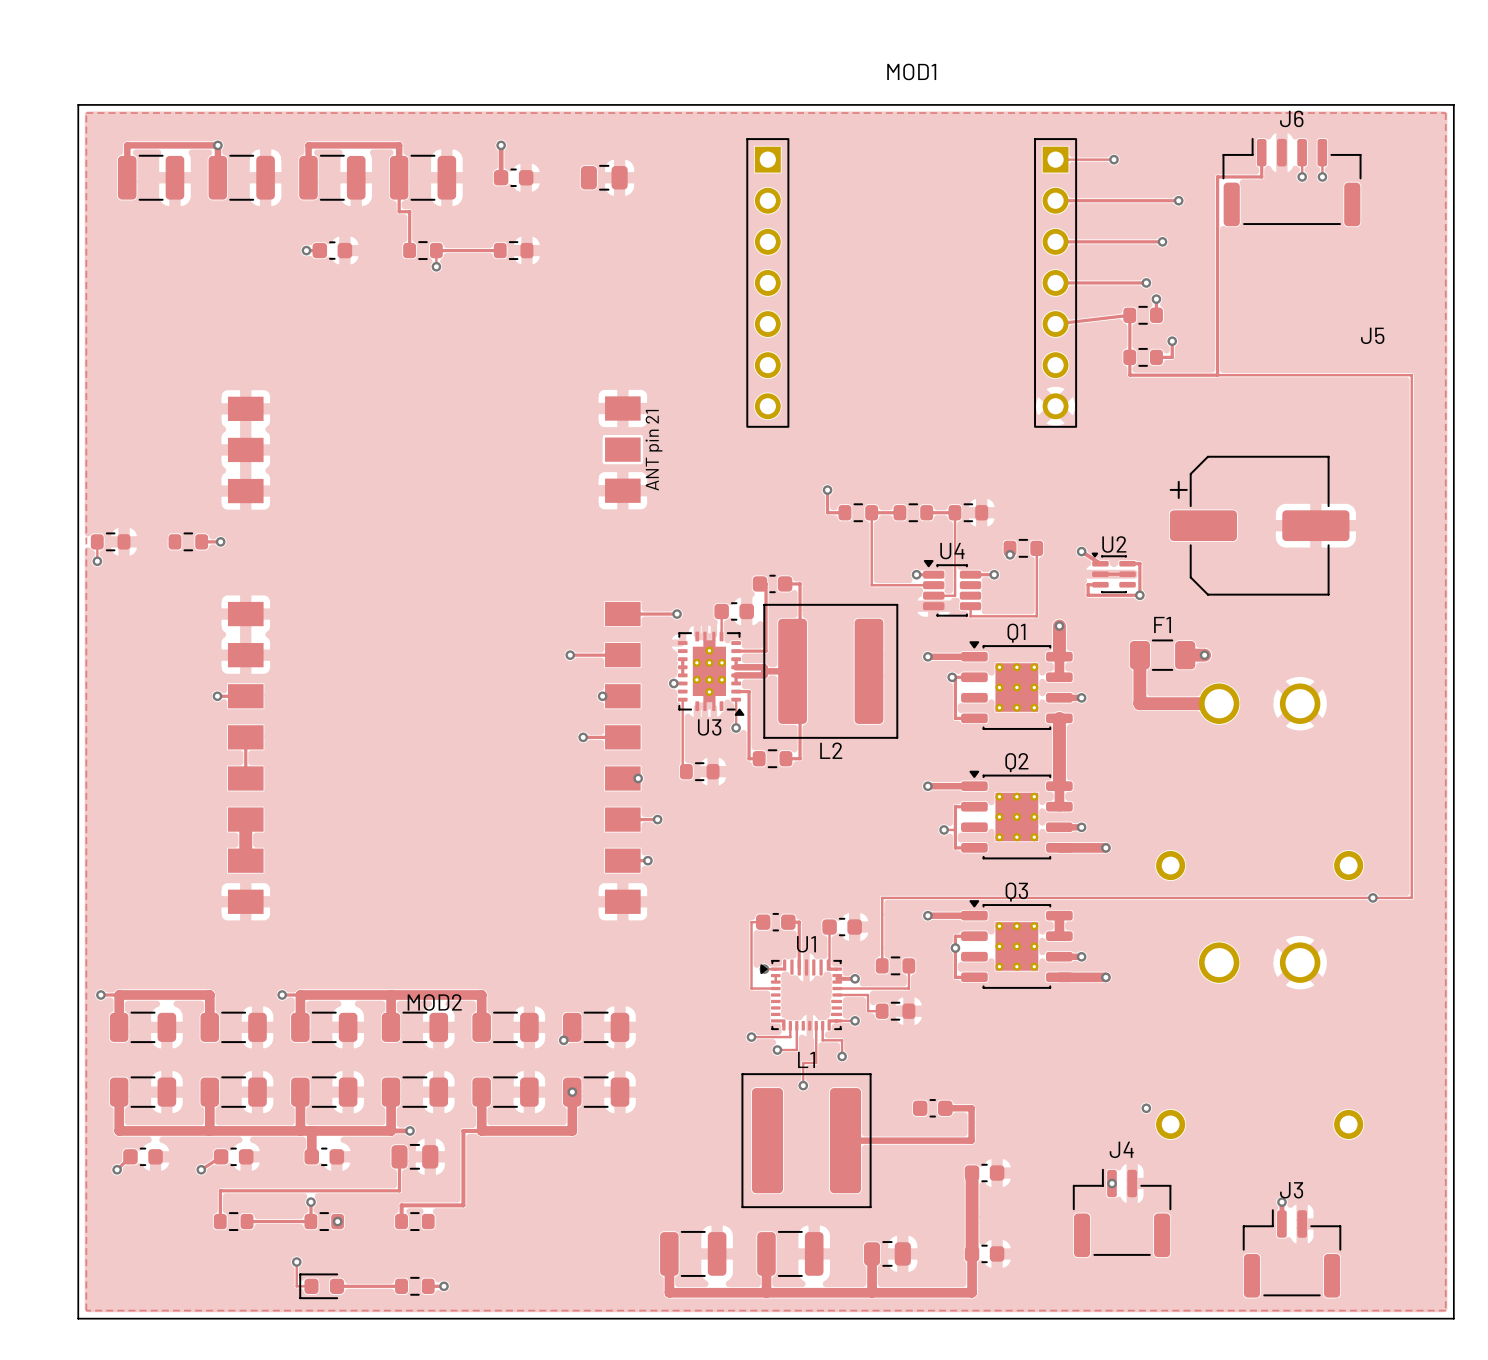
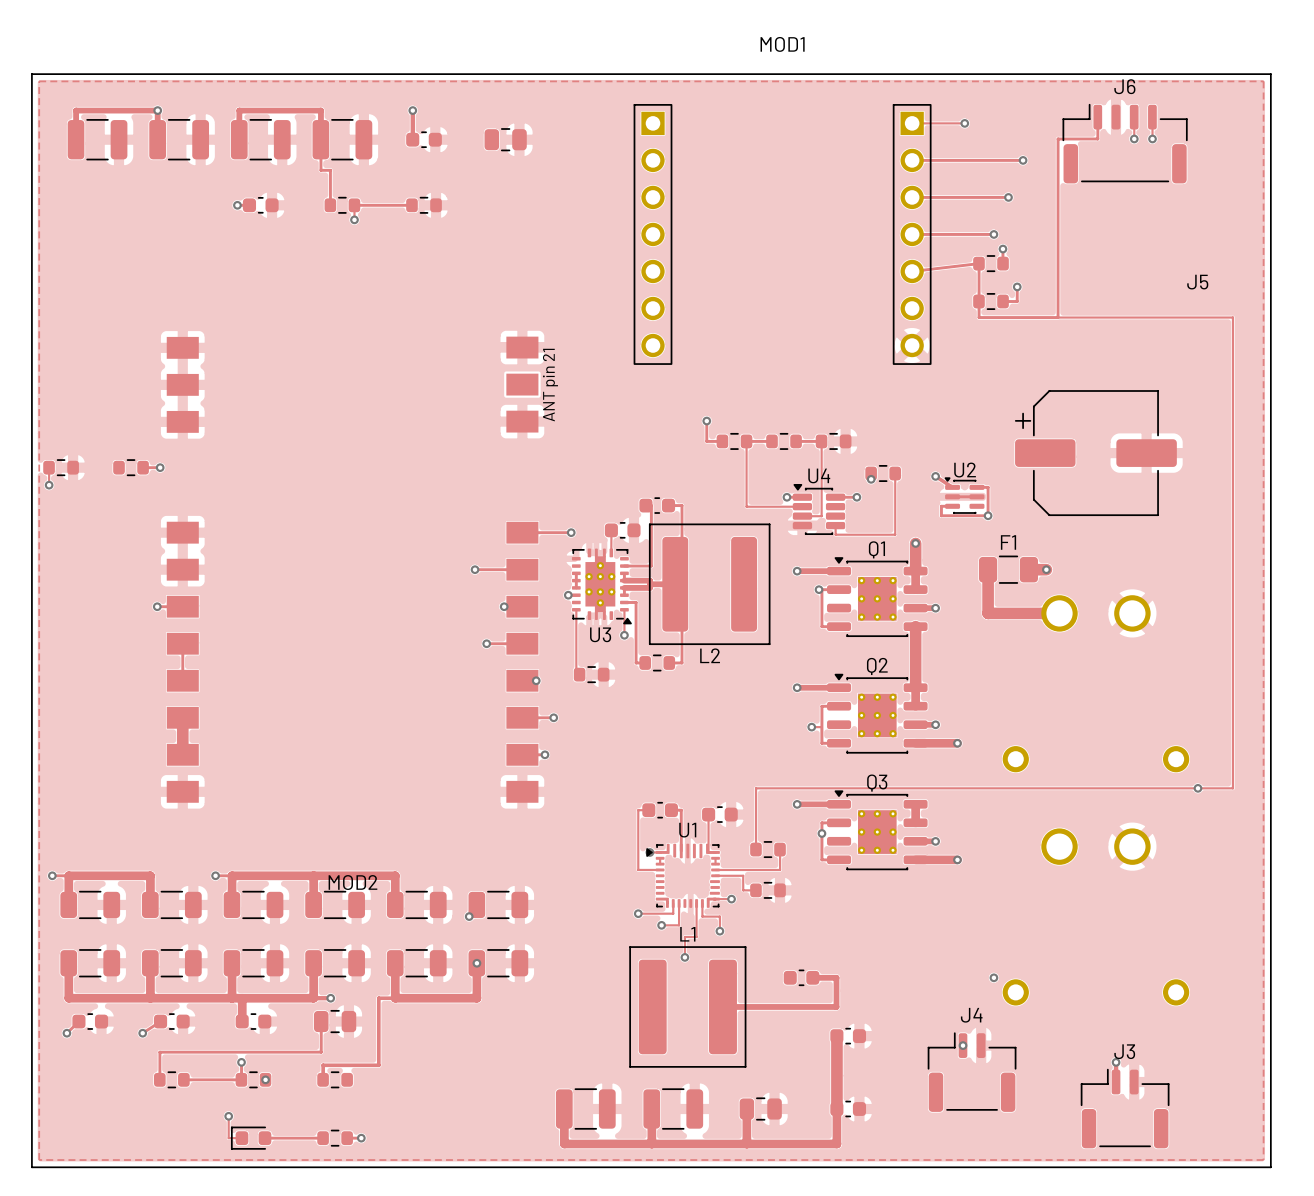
track: (837, 978) (855, 978) -> none
via: (855, 978) -> none

